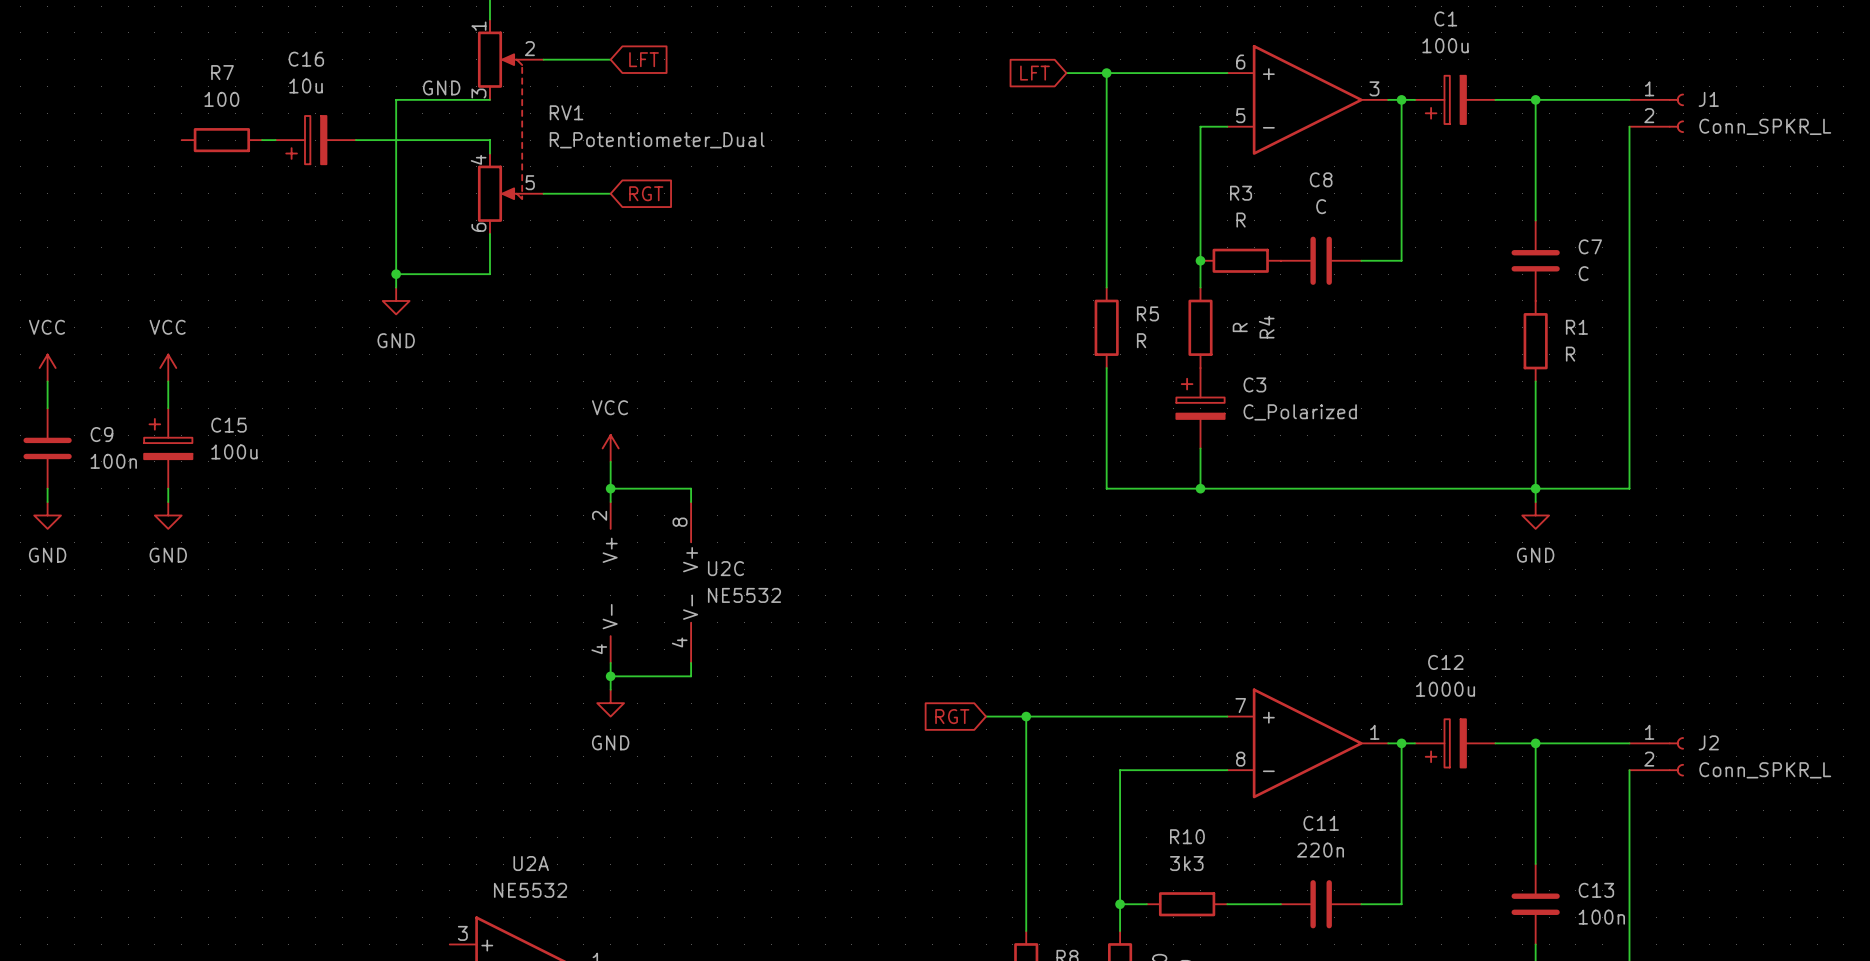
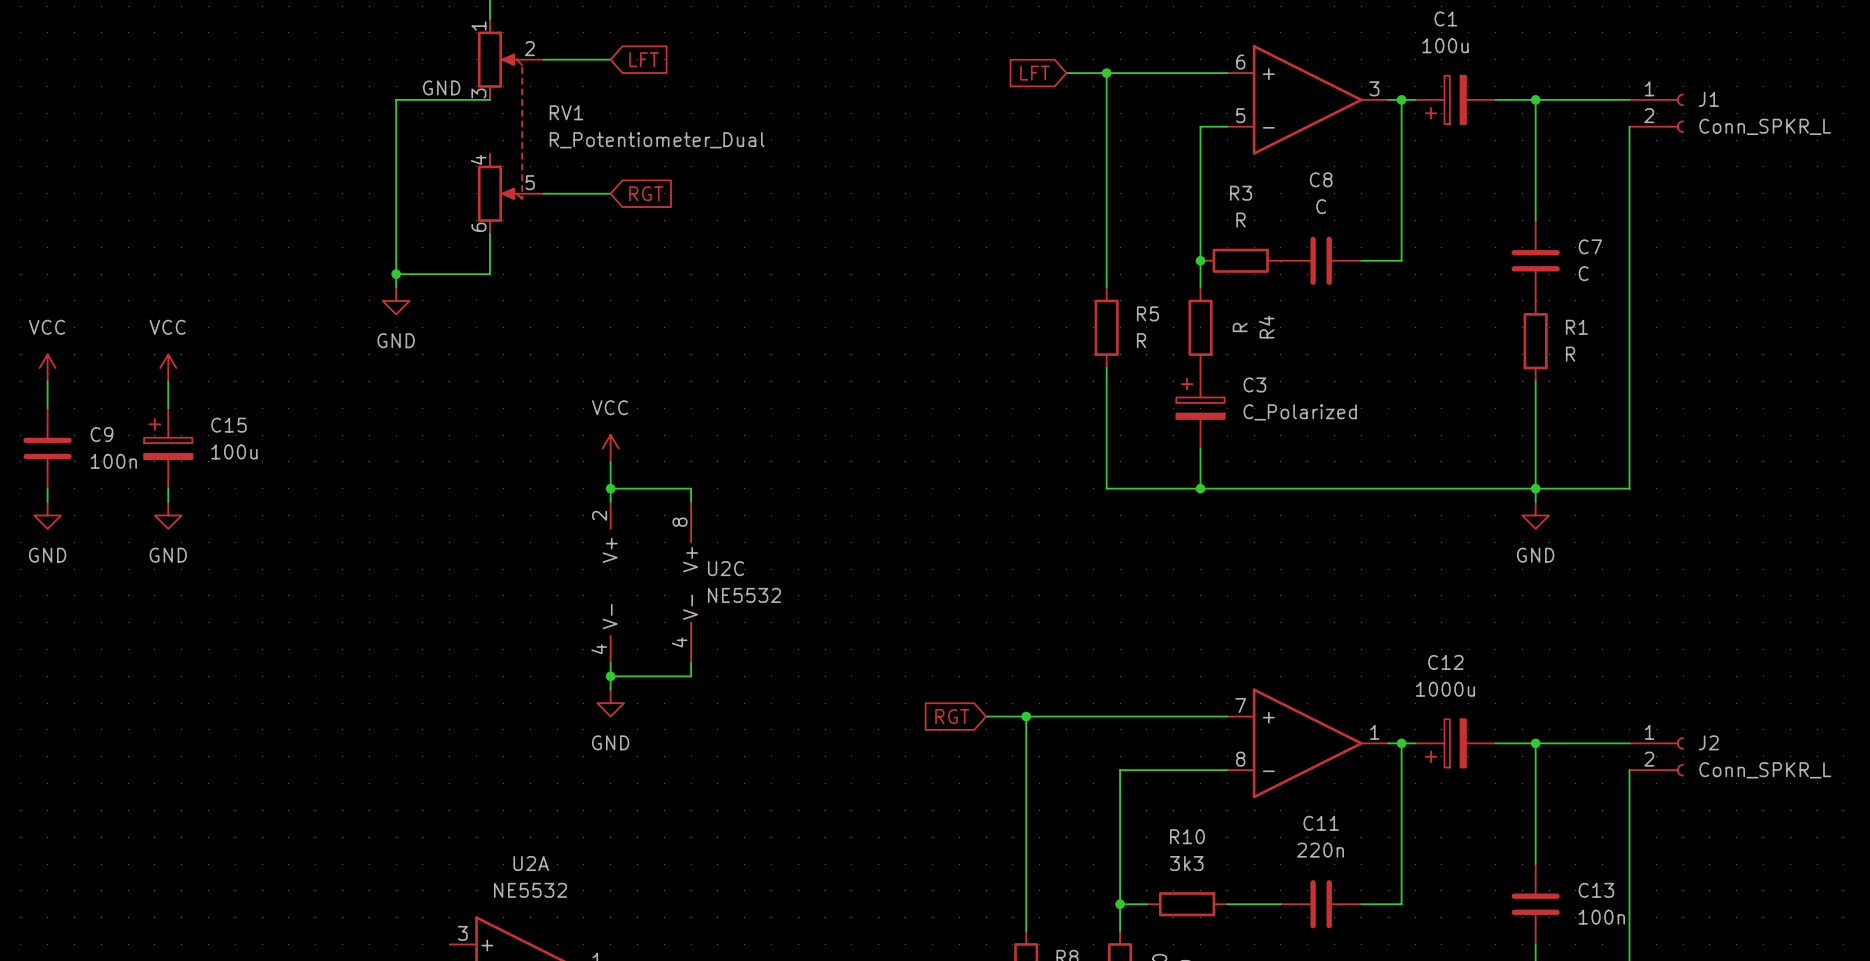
R7: 100 (221, 140) -> none
wire: (262, 140) (275, 140) -> none
C16: 10u (315, 140) -> none
wire: (355, 140) (489, 140) (489, 153) -> none

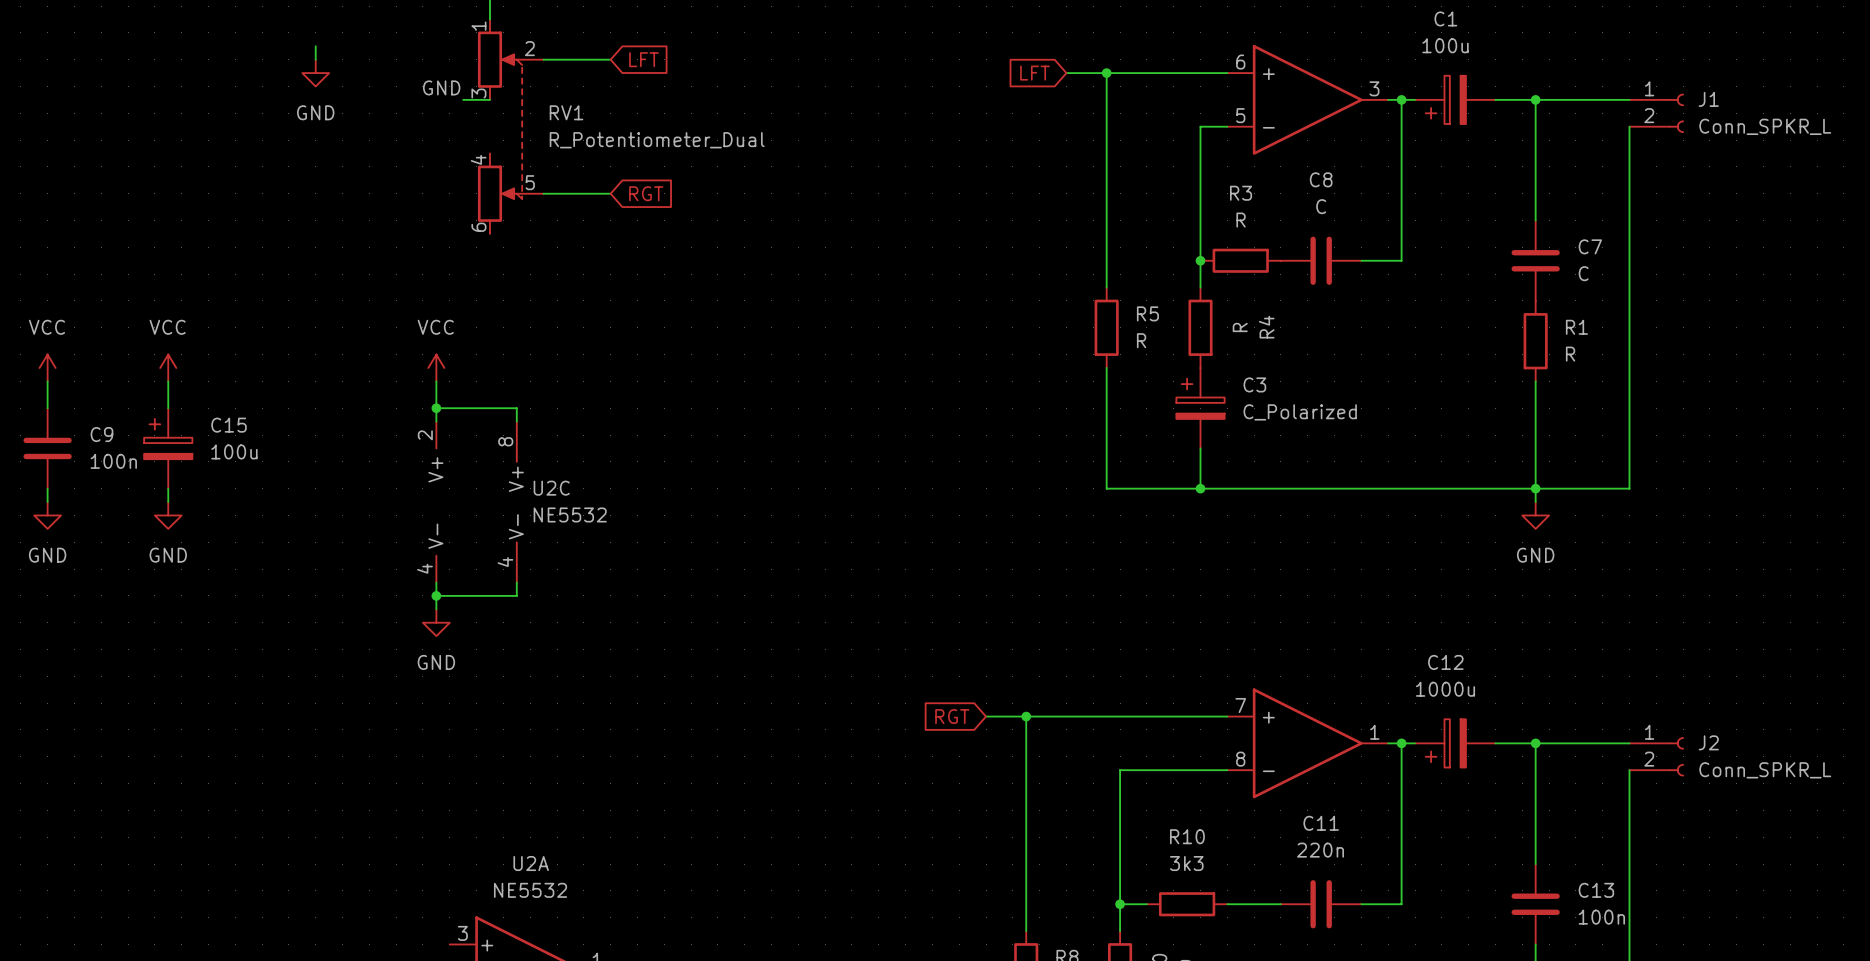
wire: none -> (315, 46) (315, 59)
power symbol: none -> GND (315, 73)
wire: (463, 99) (396, 99) (396, 287) -> none
wire: (489, 233) (489, 274) (396, 274) -> none
junction: (396, 274) -> none
power symbol: GND (396, 300) -> none
junction: none -> (436, 408)
power symbol position: VCC (610, 448) -> VCC (436, 368)
wire: (610, 461) (610, 502) -> (436, 381) (436, 421)
wire: (610, 488) (691, 488) (691, 502) -> (436, 408) (516, 408) (516, 421)
junction: (610, 488) -> none
part position: (610, 582) -> (436, 502)
U2C position: (691, 582) -> (516, 502)
junction: none -> (436, 595)
power symbol: none -> GND (436, 622)
wire: (610, 662) (610, 689) -> (436, 582) (436, 609)
wire: (691, 662) (691, 676) (610, 676) -> (516, 582) (516, 595) (436, 595)
junction: (610, 676) -> none
power symbol: GND (610, 703) -> none

